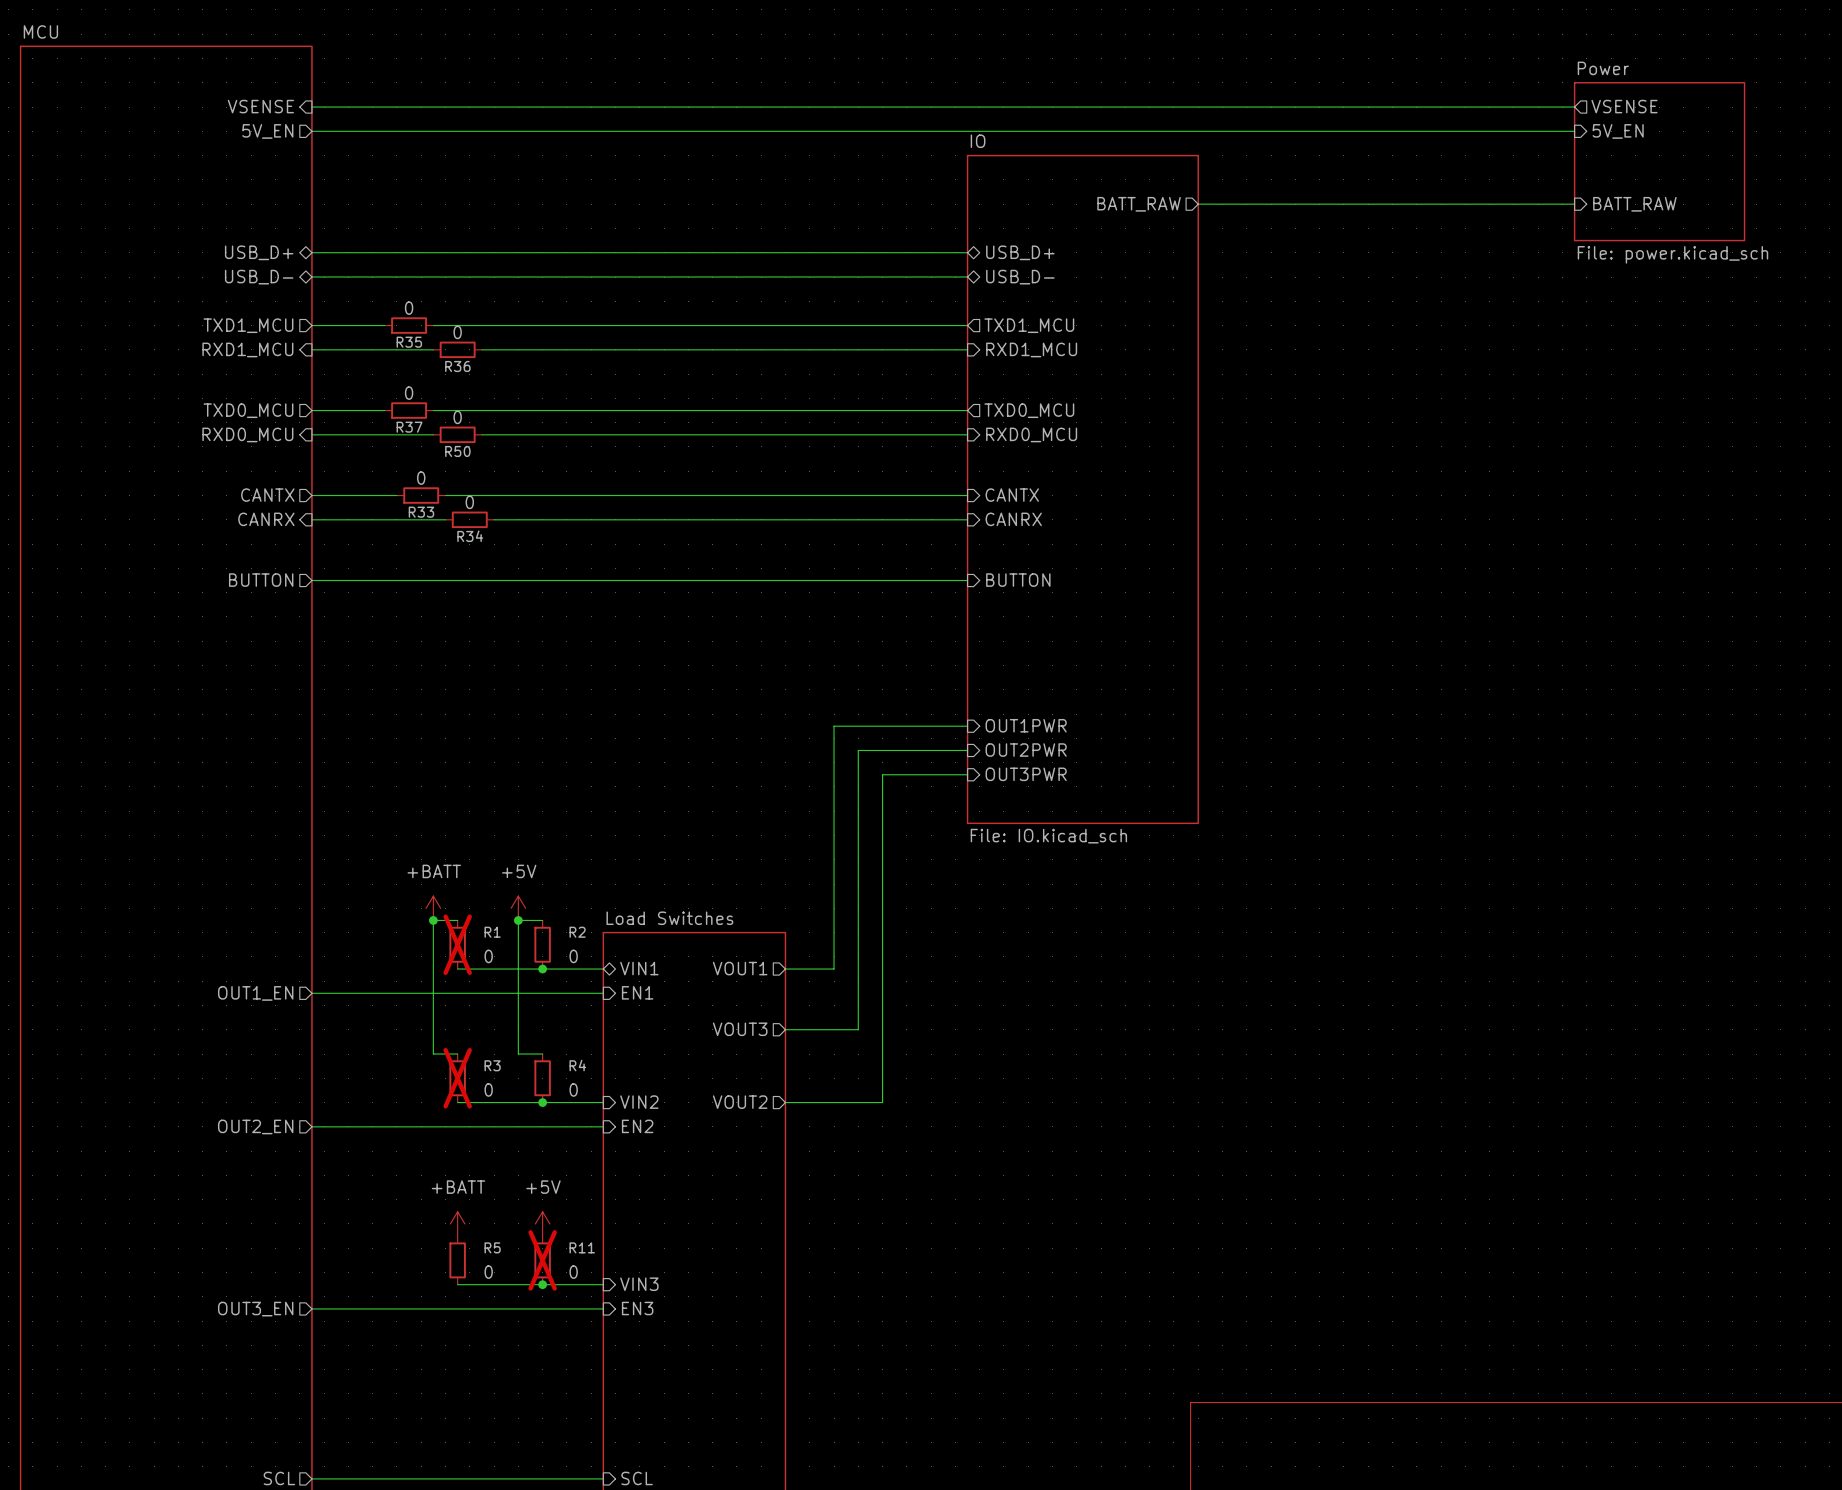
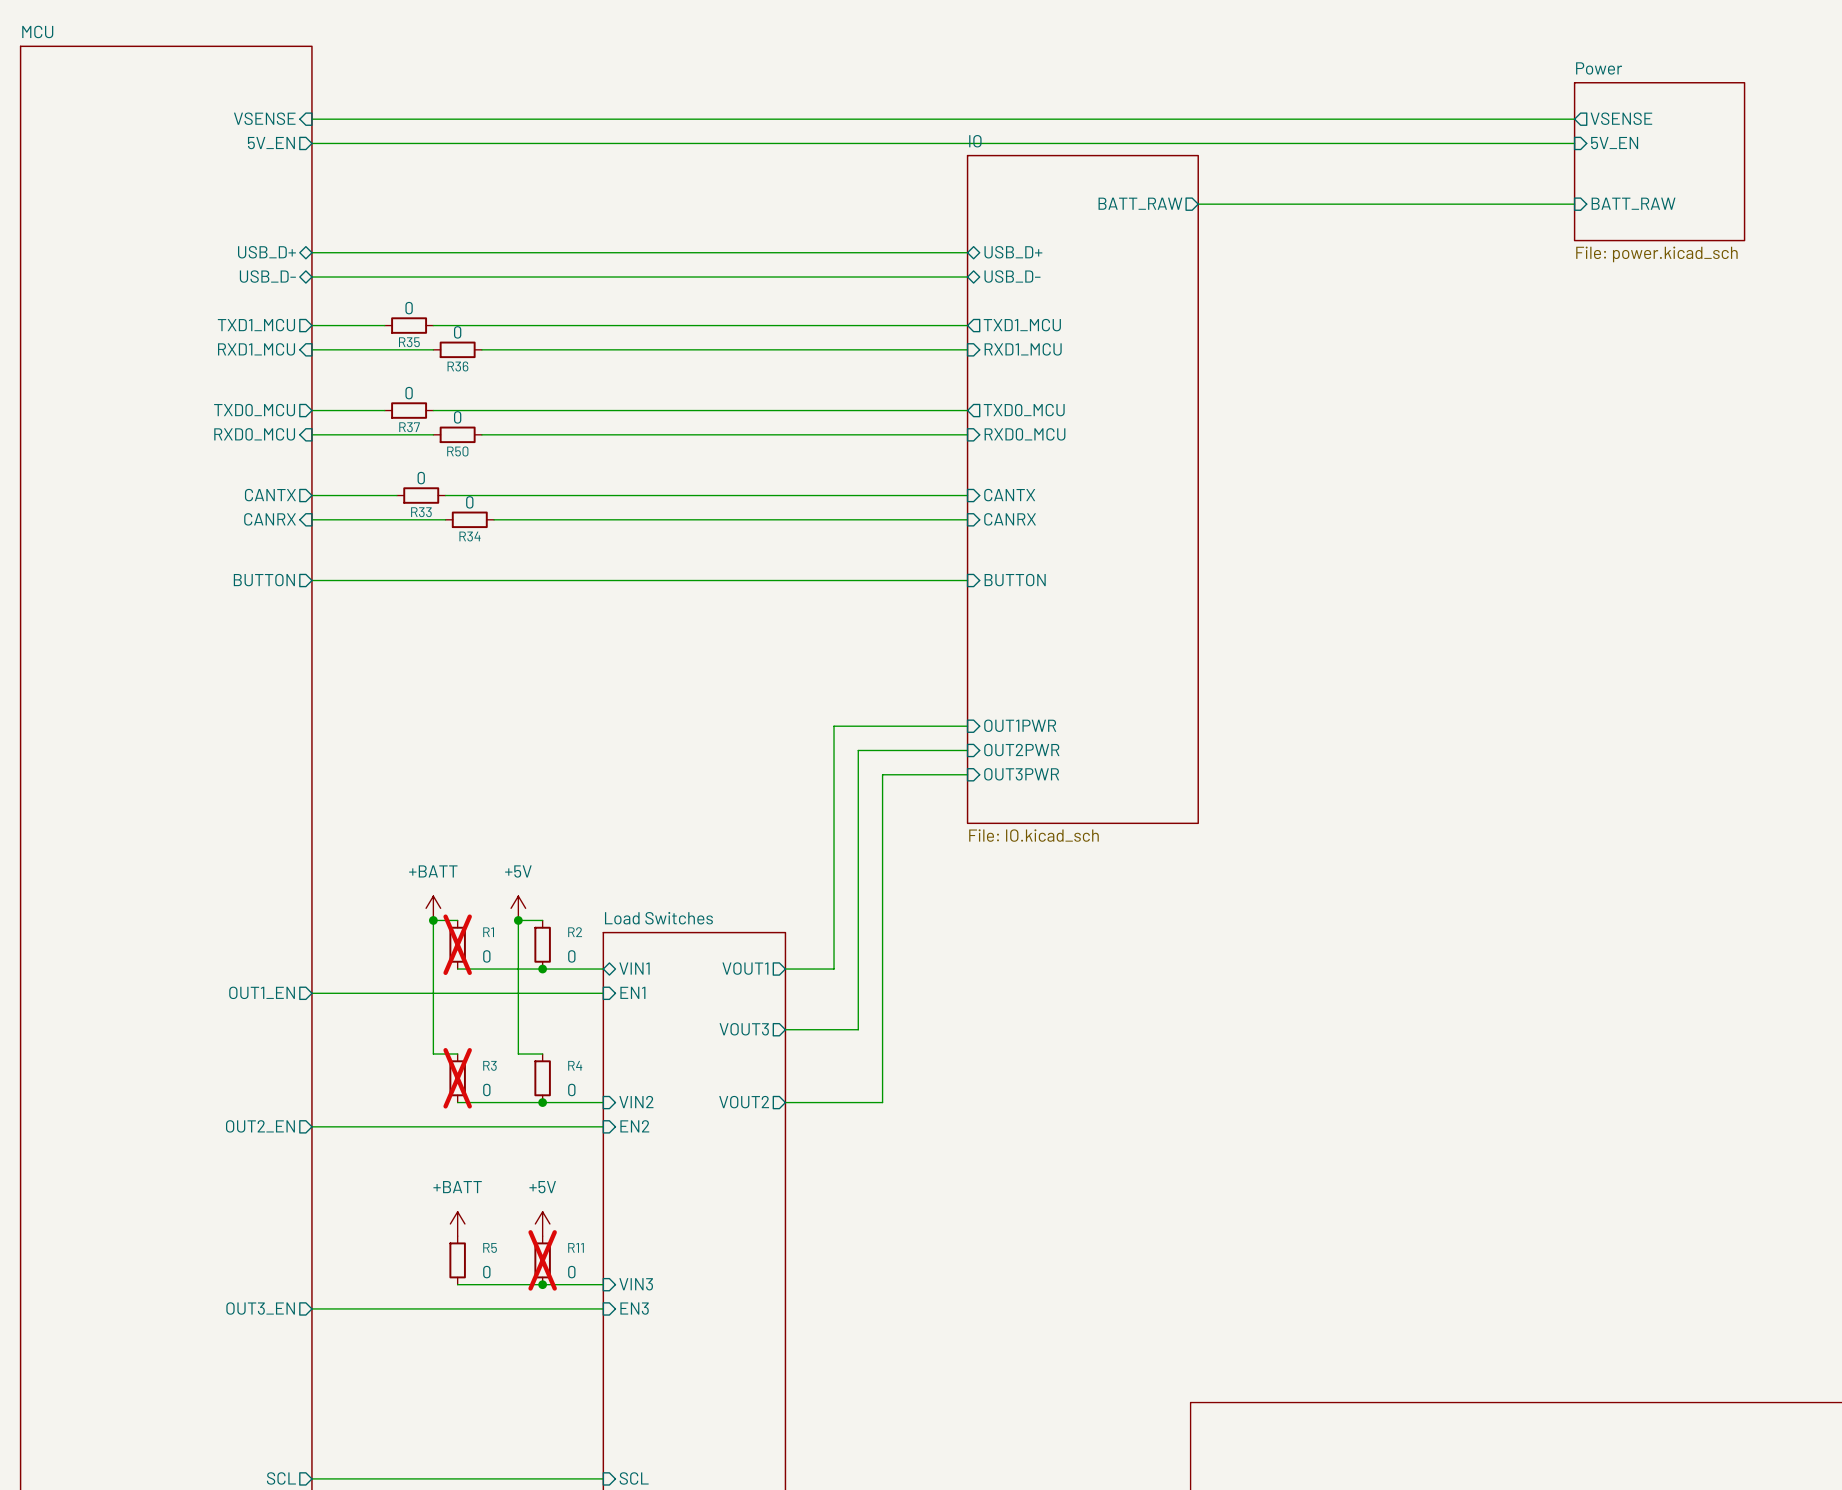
sheet pin position: VSENSE (260, 106) -> VSENSE (264, 118)
sheet pin position: VSENSE (1624, 106) -> VSENSE (1621, 118)
wire: (311, 107) (1574, 107) -> (311, 119) (1574, 119)
sheet pin position: 5V_EN (267, 131) -> 5V_EN (271, 143)
wire: (311, 131) (1574, 131) -> (311, 143) (1574, 143)
sheet pin position: 5V_EN (1618, 131) -> 5V_EN (1614, 143)

